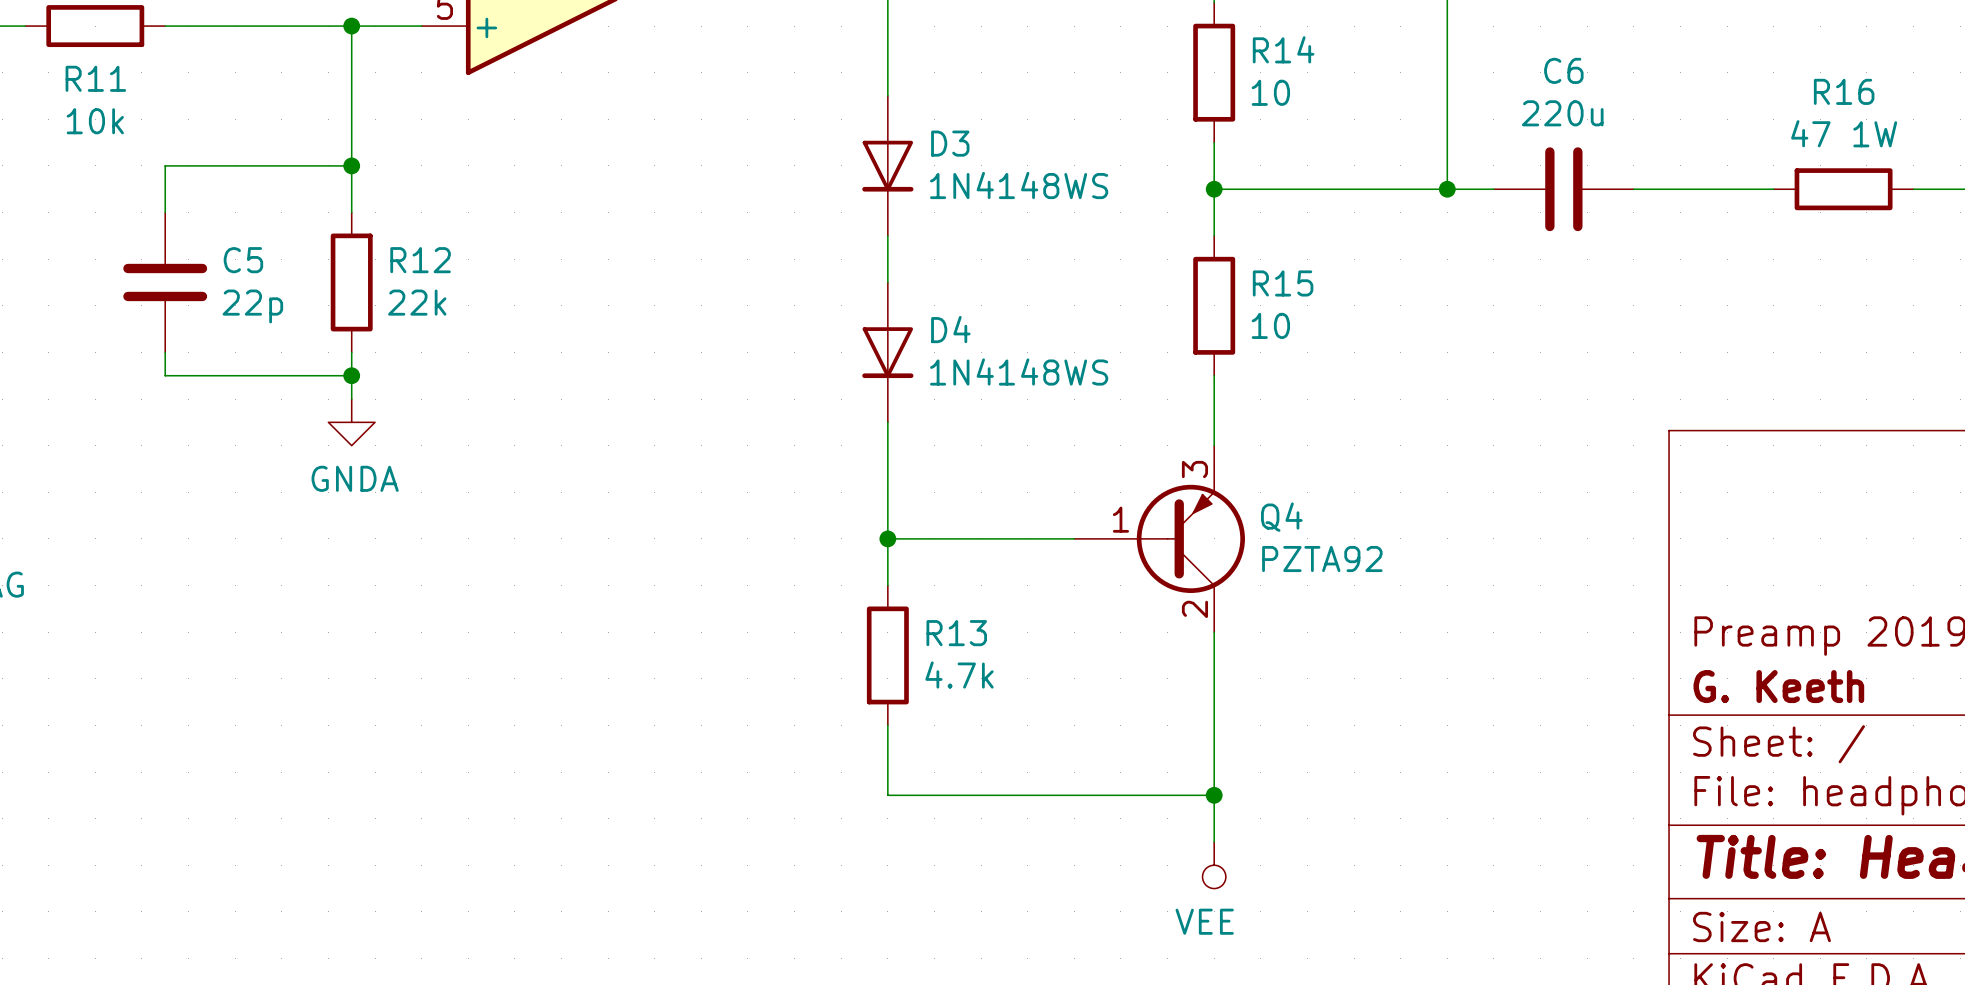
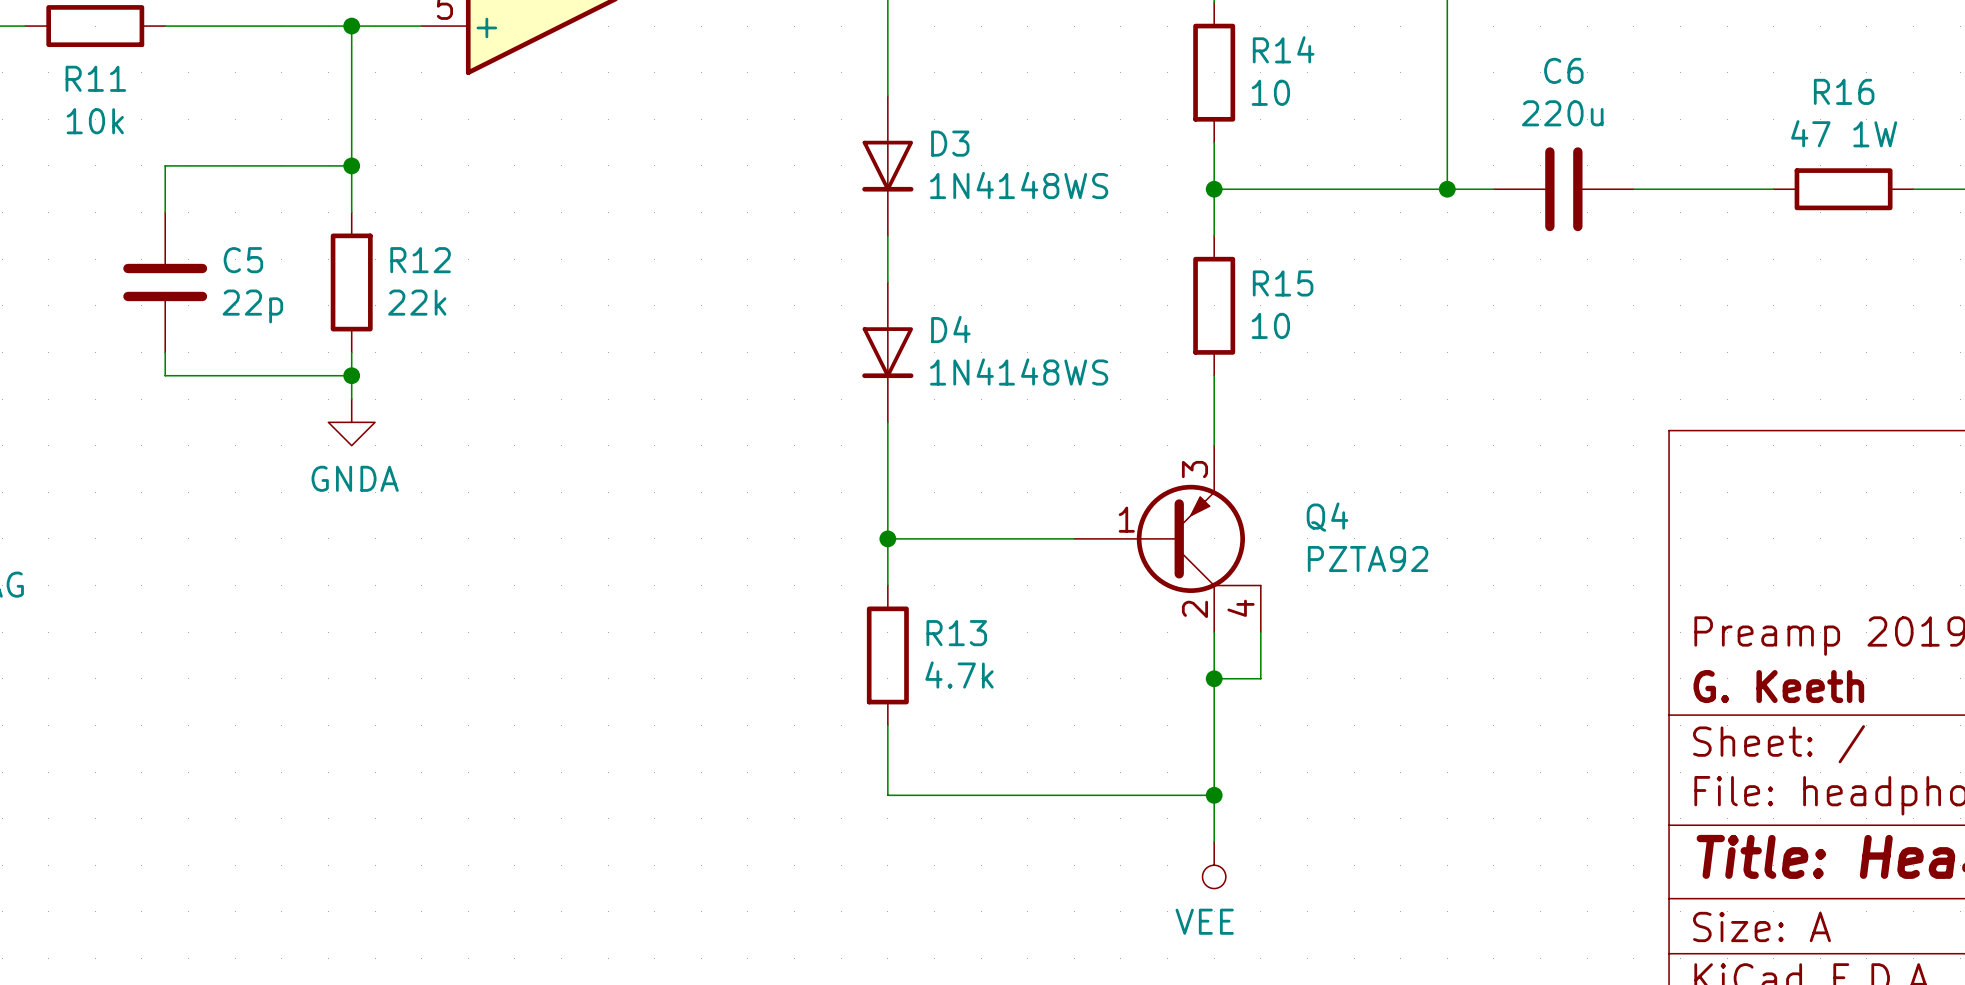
Q4 symbol: [1074, 445, 1245, 633] -> [1074, 445, 1261, 633]
Q4 name position: Q4 (1281, 517) -> Q4 (1327, 517)
Q4 value position: PZTA92 (1322, 559) -> PZTA92 (1368, 559)
wire: none -> (1260, 632) (1260, 678) (1214, 678)
junction: none -> (1214, 678)

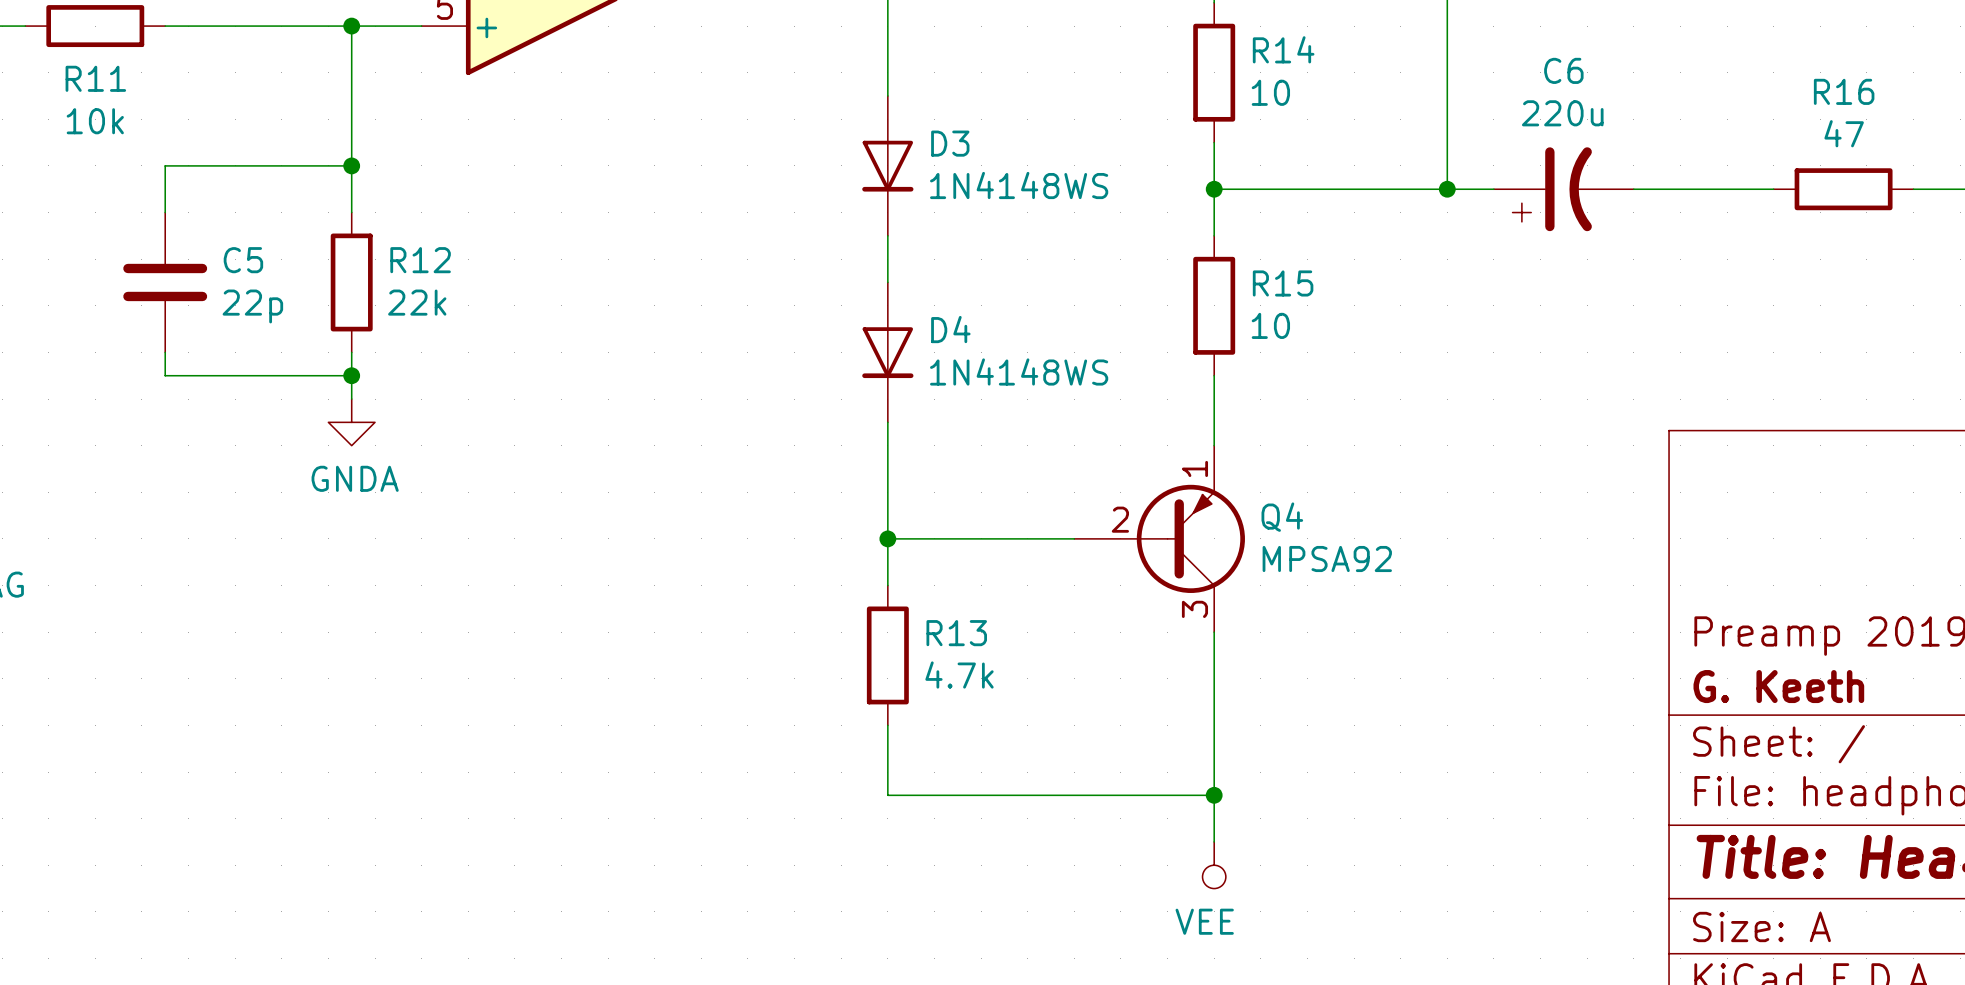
R16 value: 47 1W (1844, 133) -> 47 (1844, 133)
C6 symbol: [1493, 147, 1634, 232] -> [1493, 147, 1634, 232]
Q4 symbol: [1074, 445, 1261, 633] -> [1074, 445, 1245, 633]
Q4 name position: Q4 (1327, 517) -> Q4 (1282, 517)
Q4 value: PZTA92 (1368, 559) -> MPSA92 (1327, 559)
wire: (1260, 632) (1260, 678) (1214, 678) -> none
junction: (1214, 678) -> none

